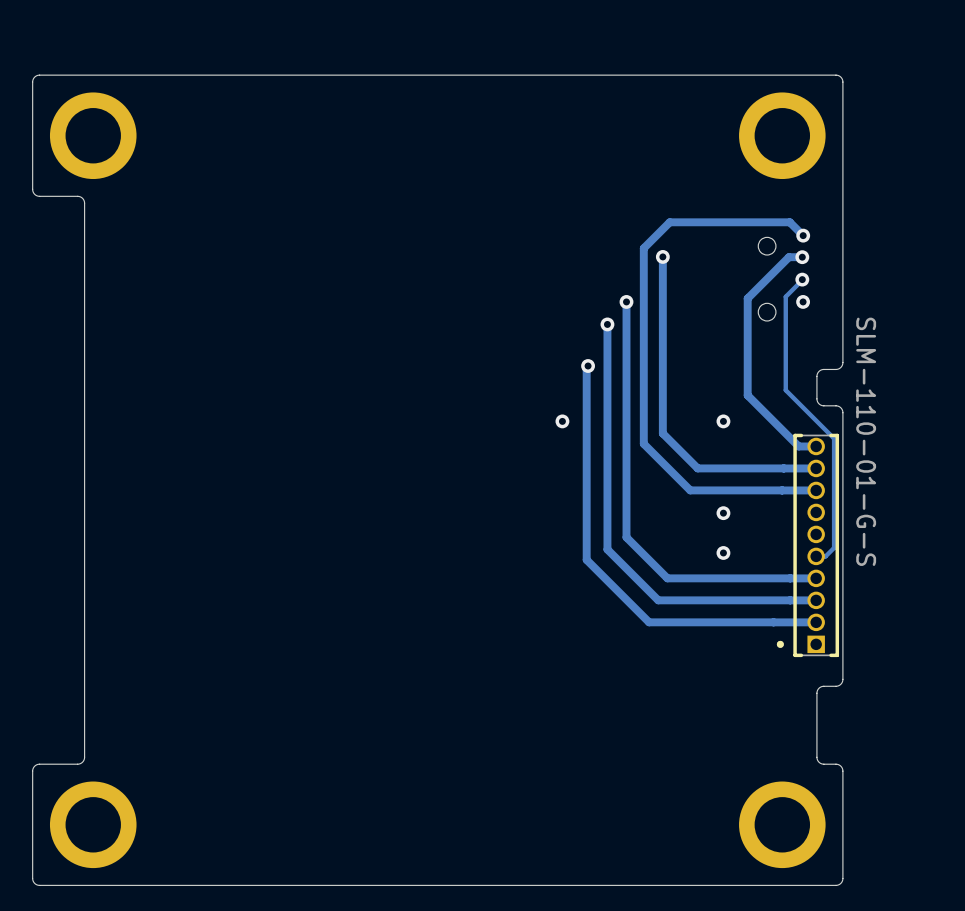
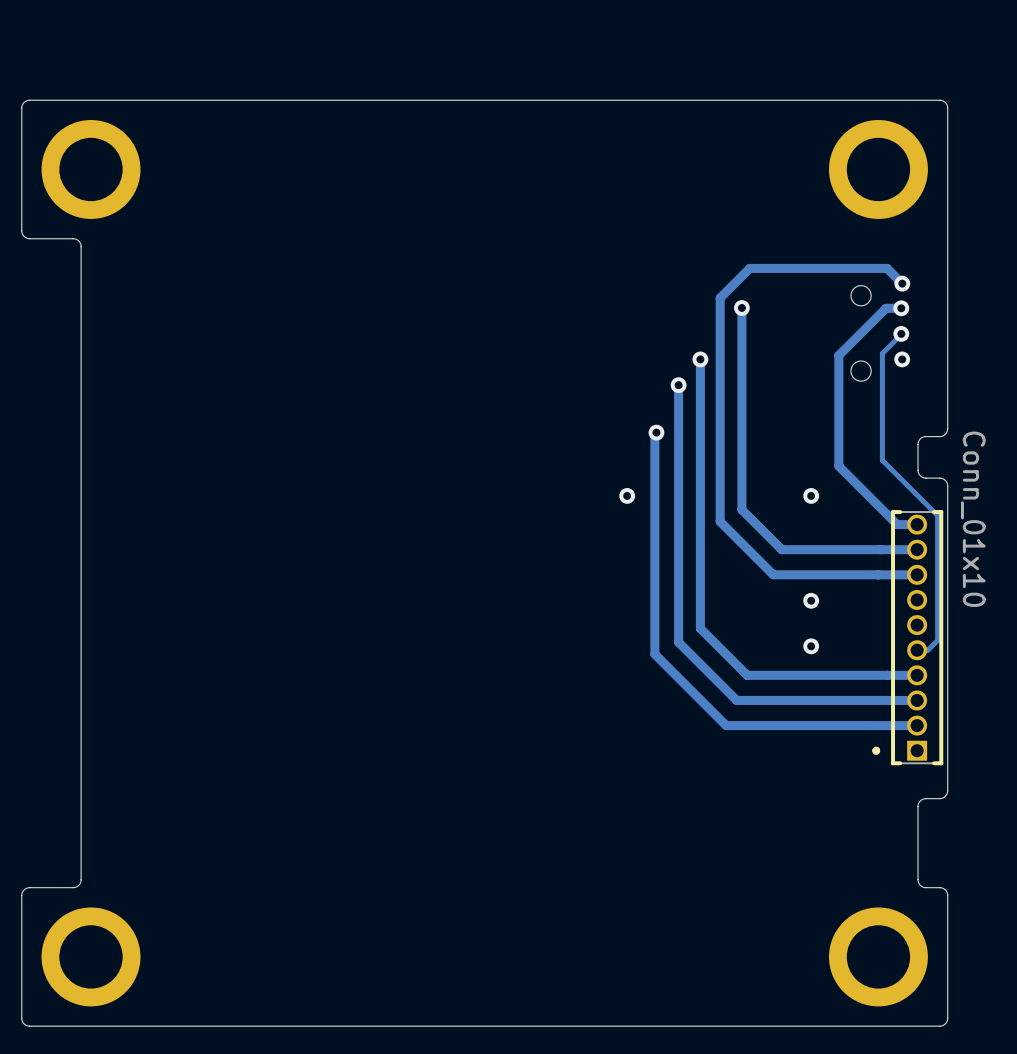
part value: SLM-110-01-G-S (866, 441) -> Conn_01x10 (973, 519)

